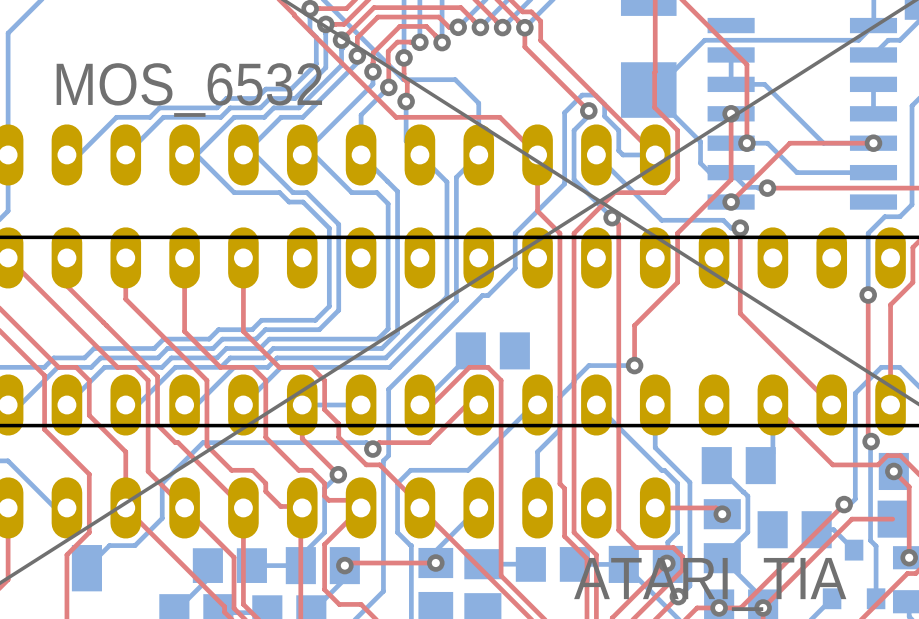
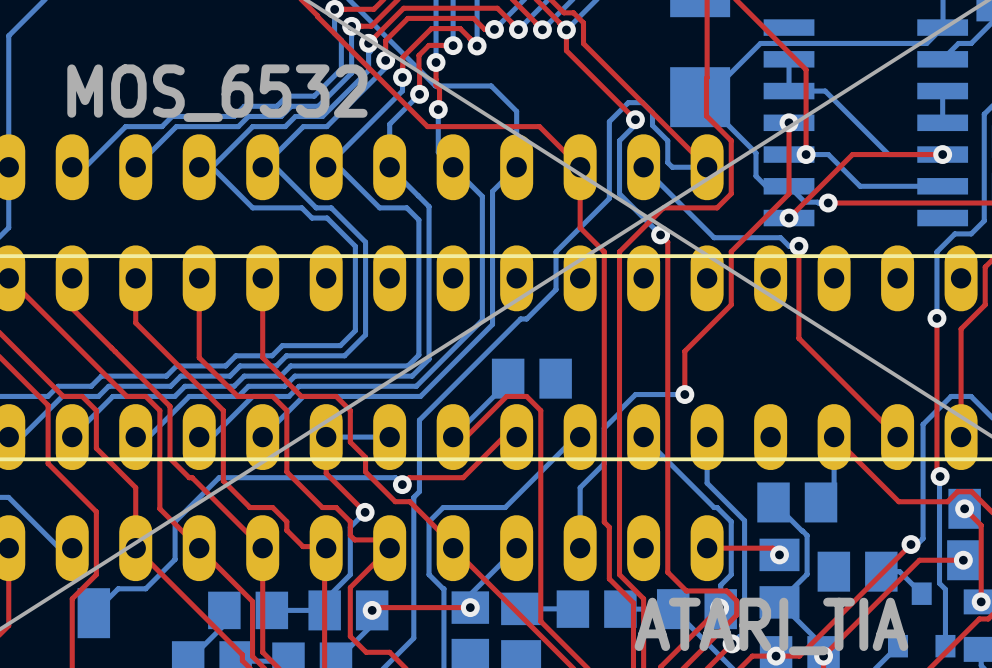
via: none -> (963, 560)

